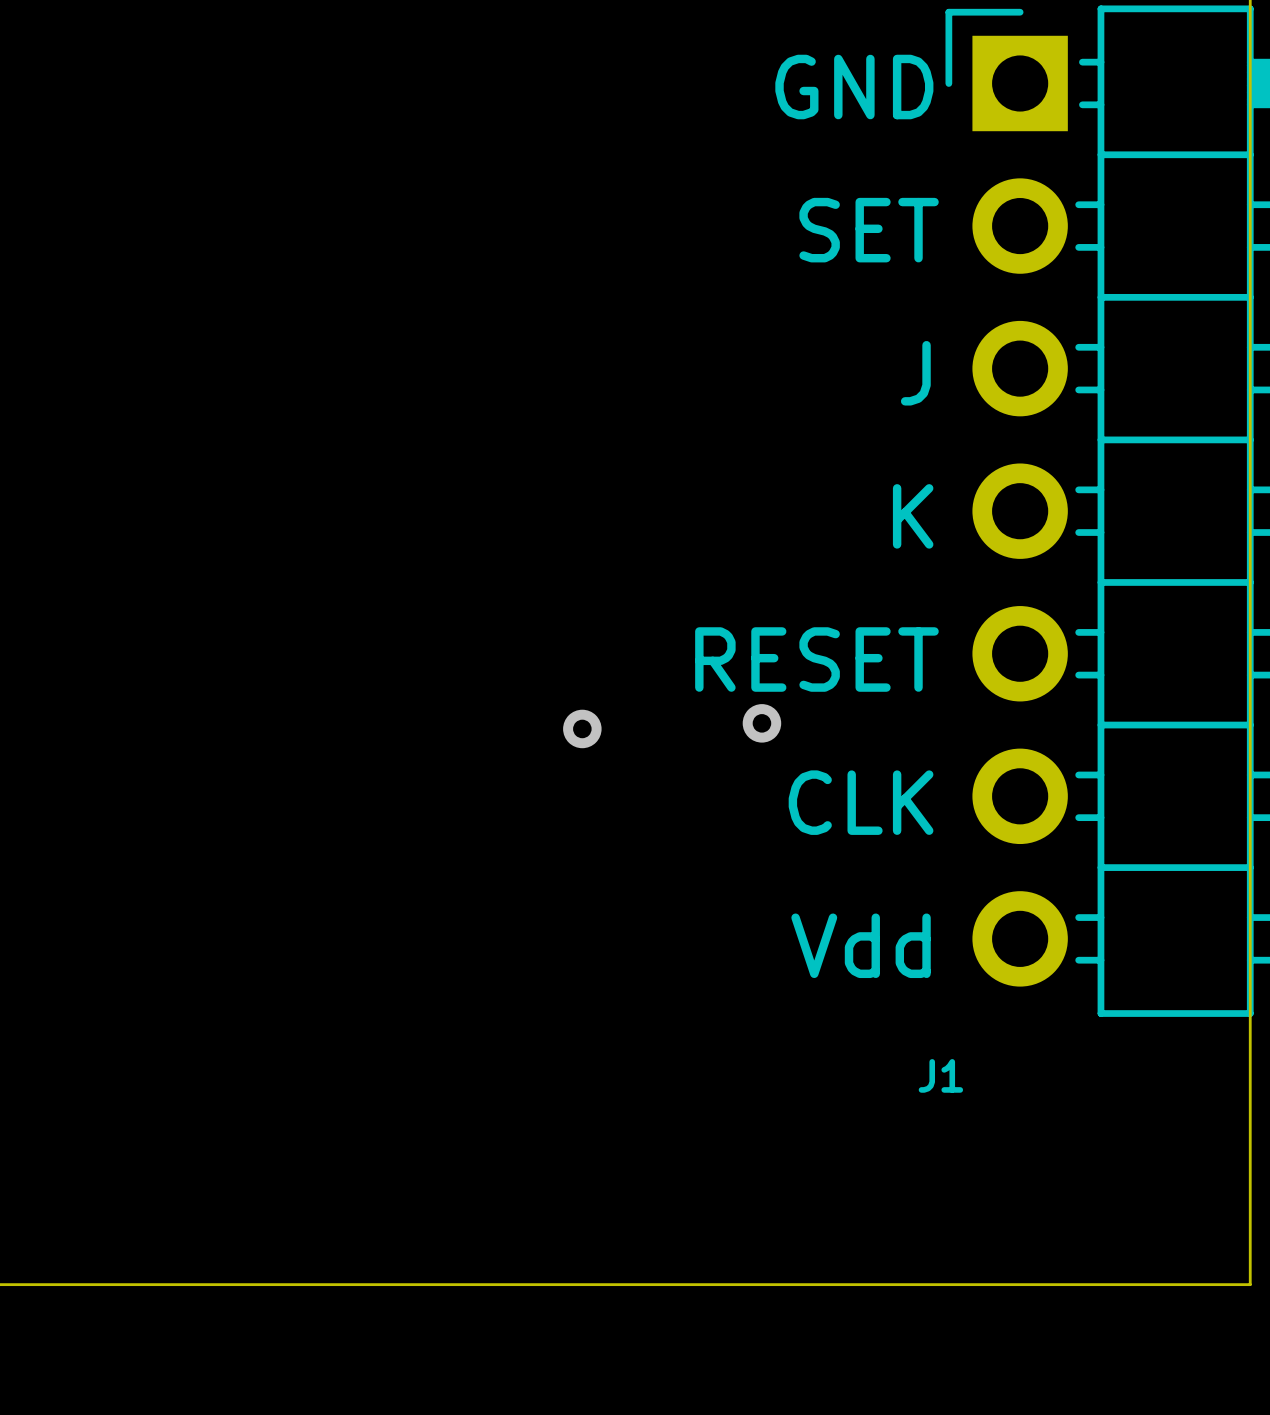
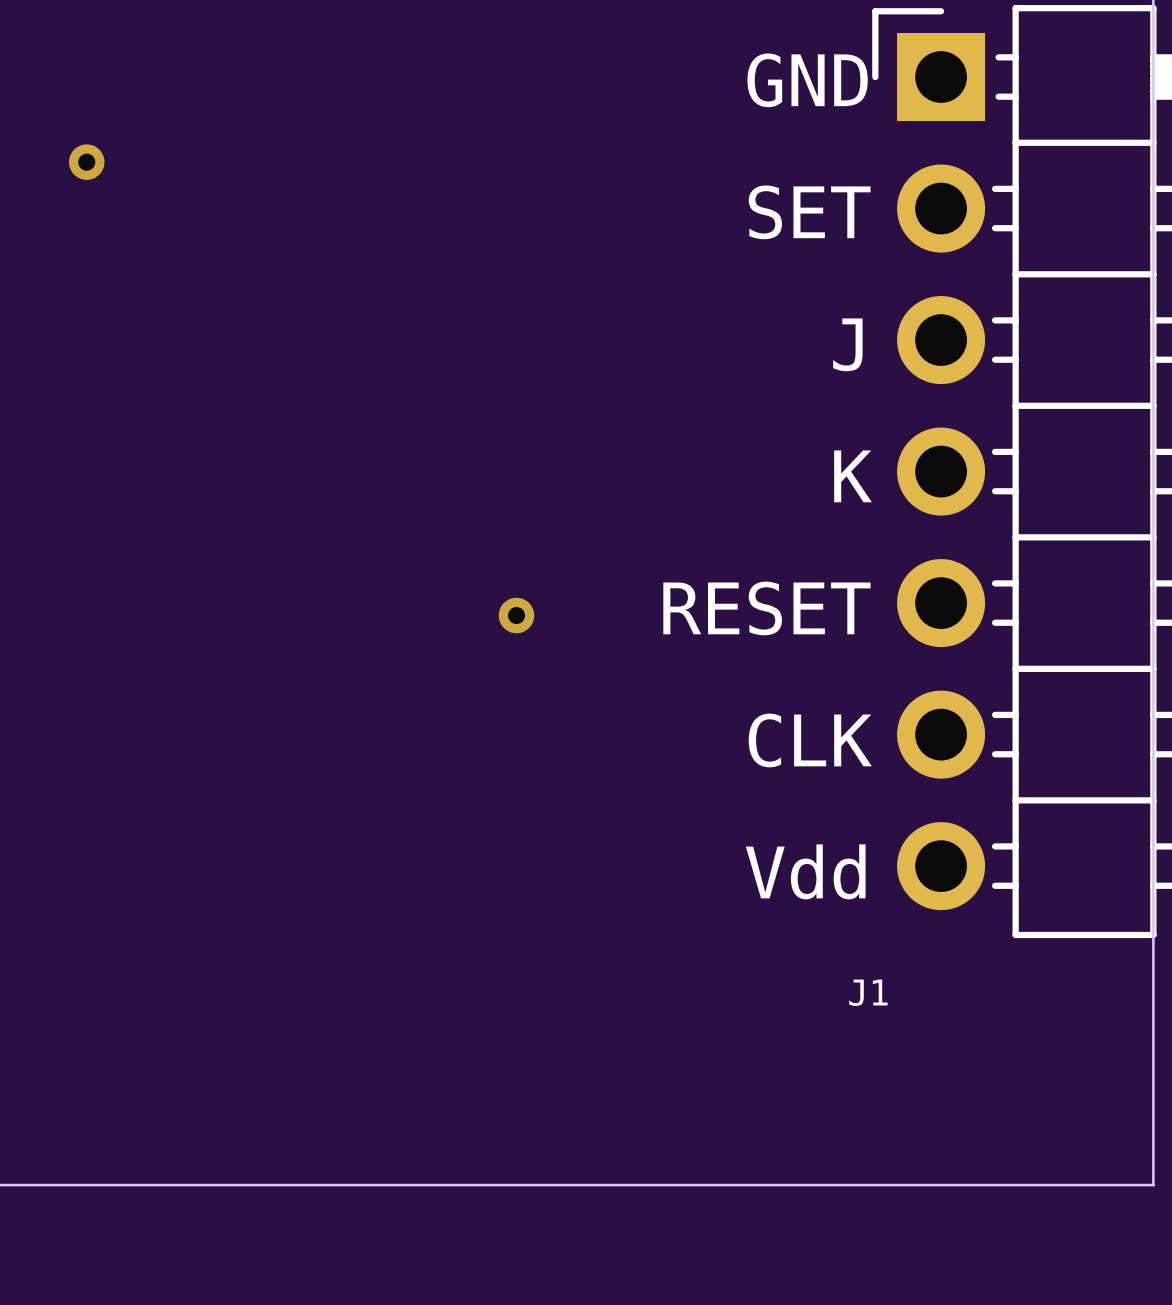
via: none -> (86, 162)
via: (761, 723) -> none
via position: (582, 728) -> (516, 615)

